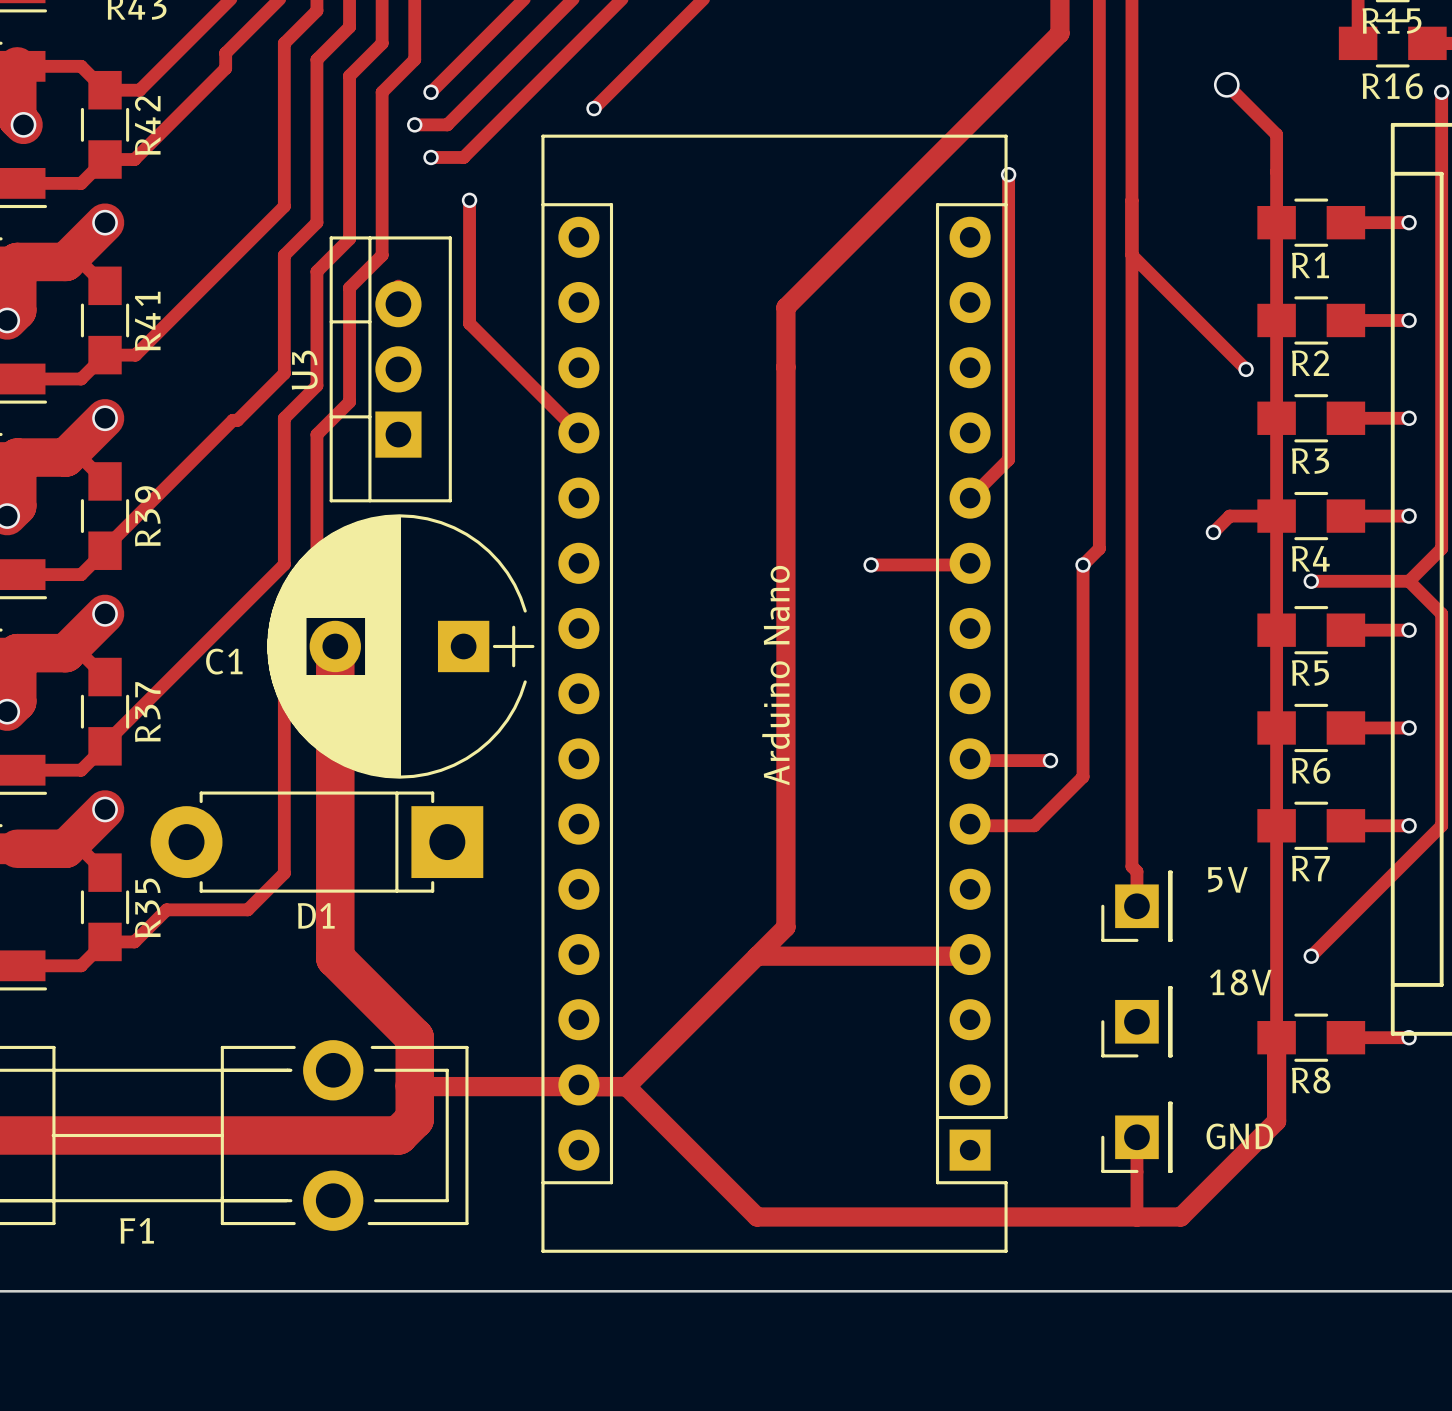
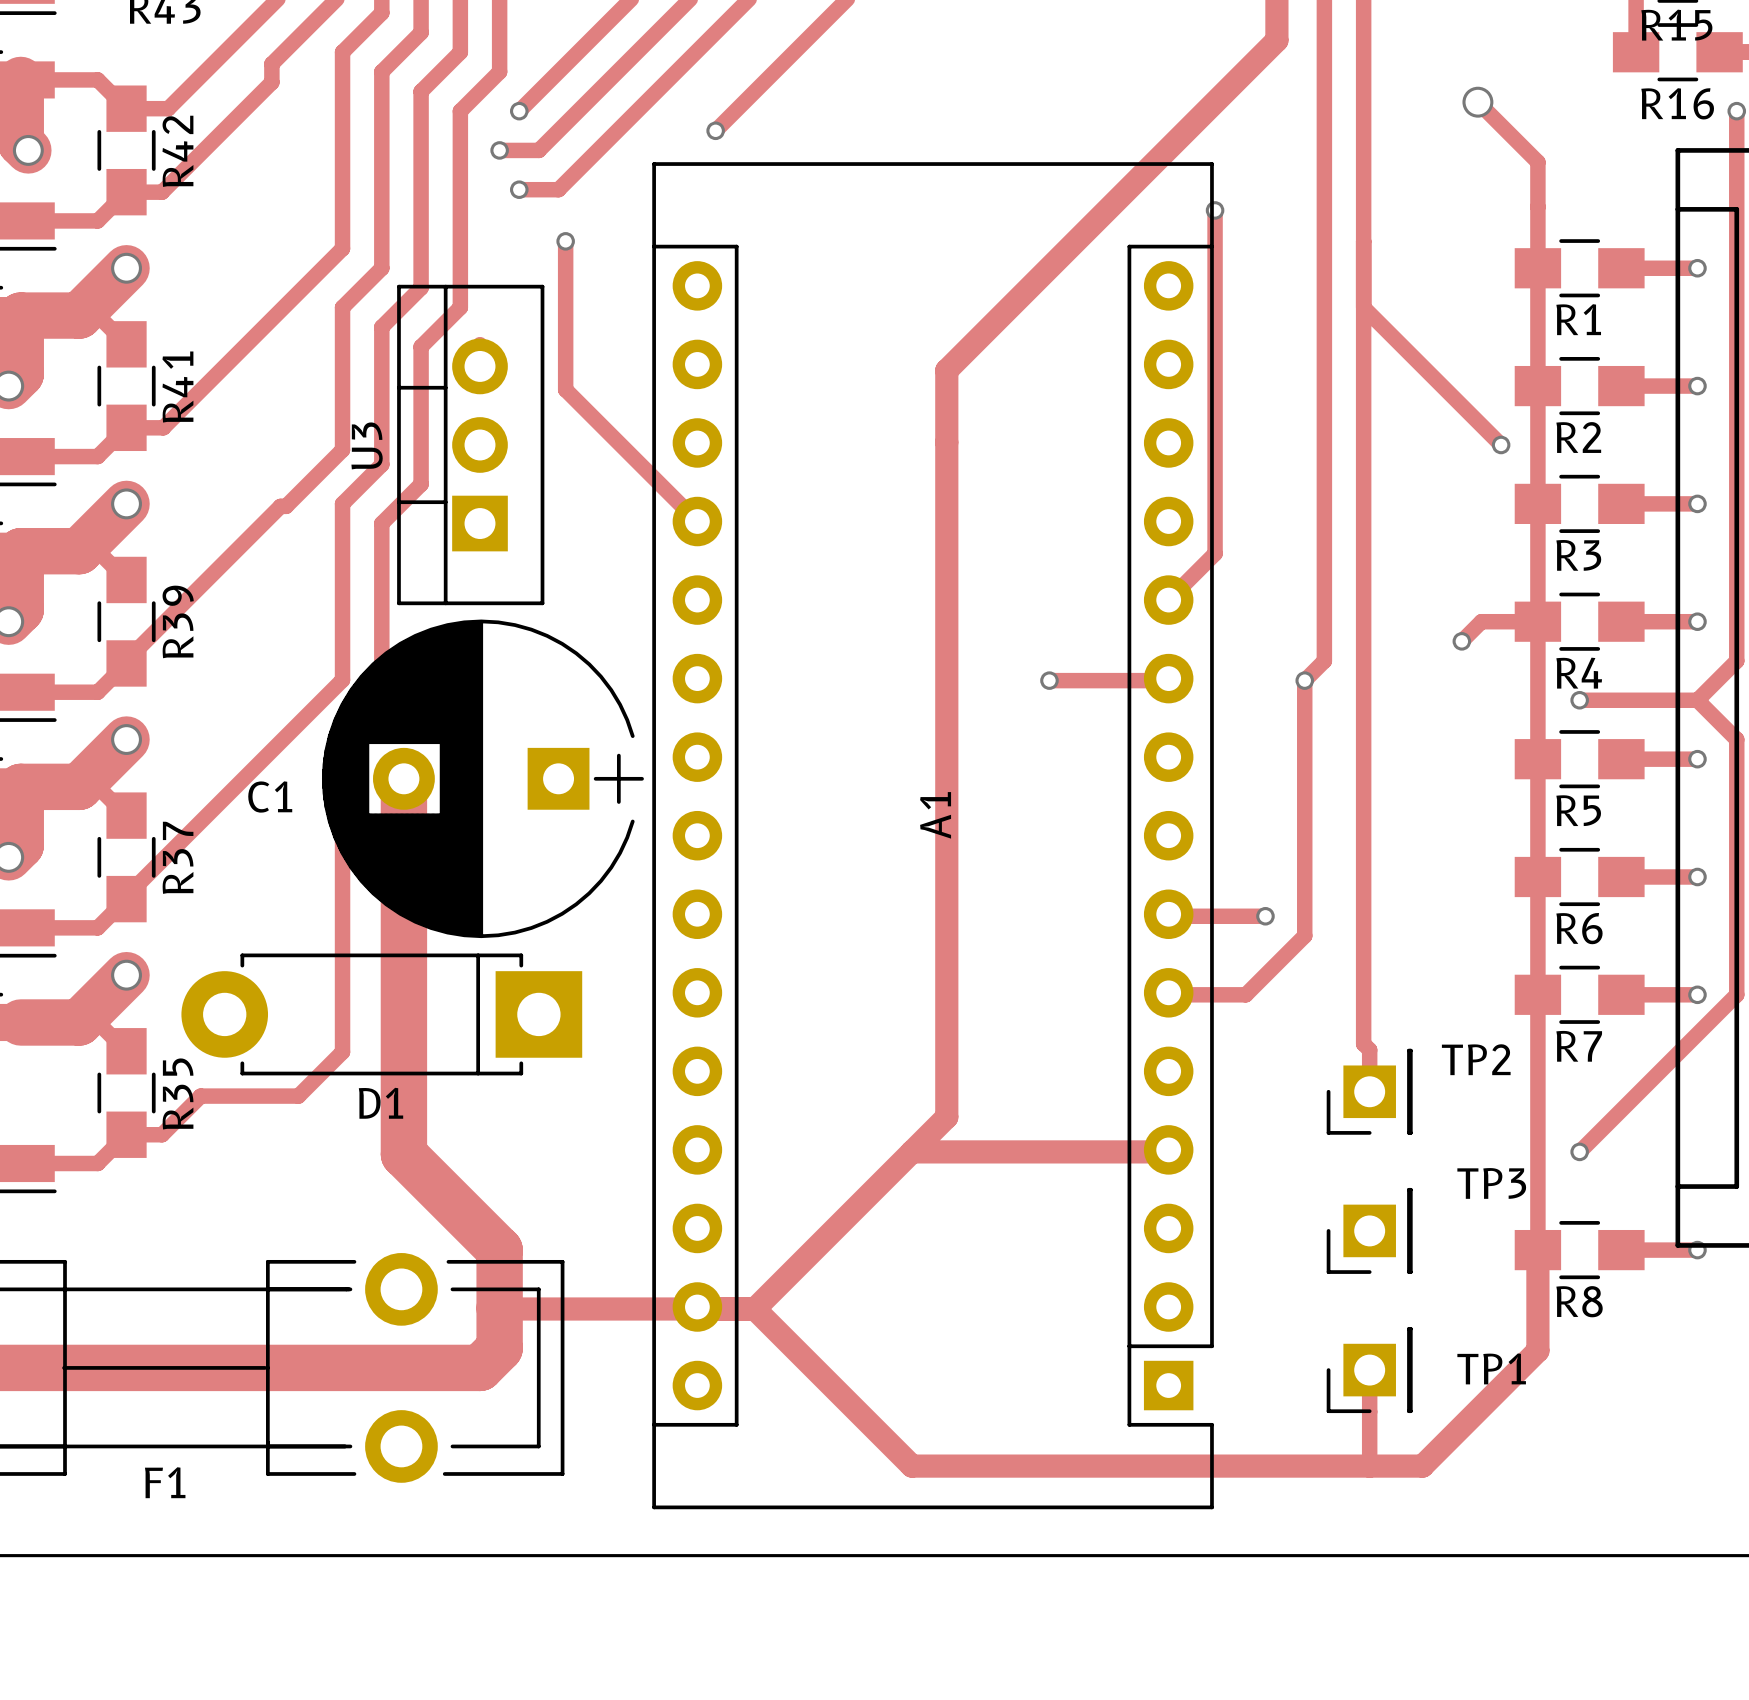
Arduino Nano name: Arduino Nano (775, 675) -> A1 (935, 815)
5V name: 5V (1227, 879) -> TP2 (1476, 1059)
18V name: 18V (1240, 982) -> TP3 (1491, 1183)
GND name: GND (1239, 1136) -> TP1 (1491, 1368)

